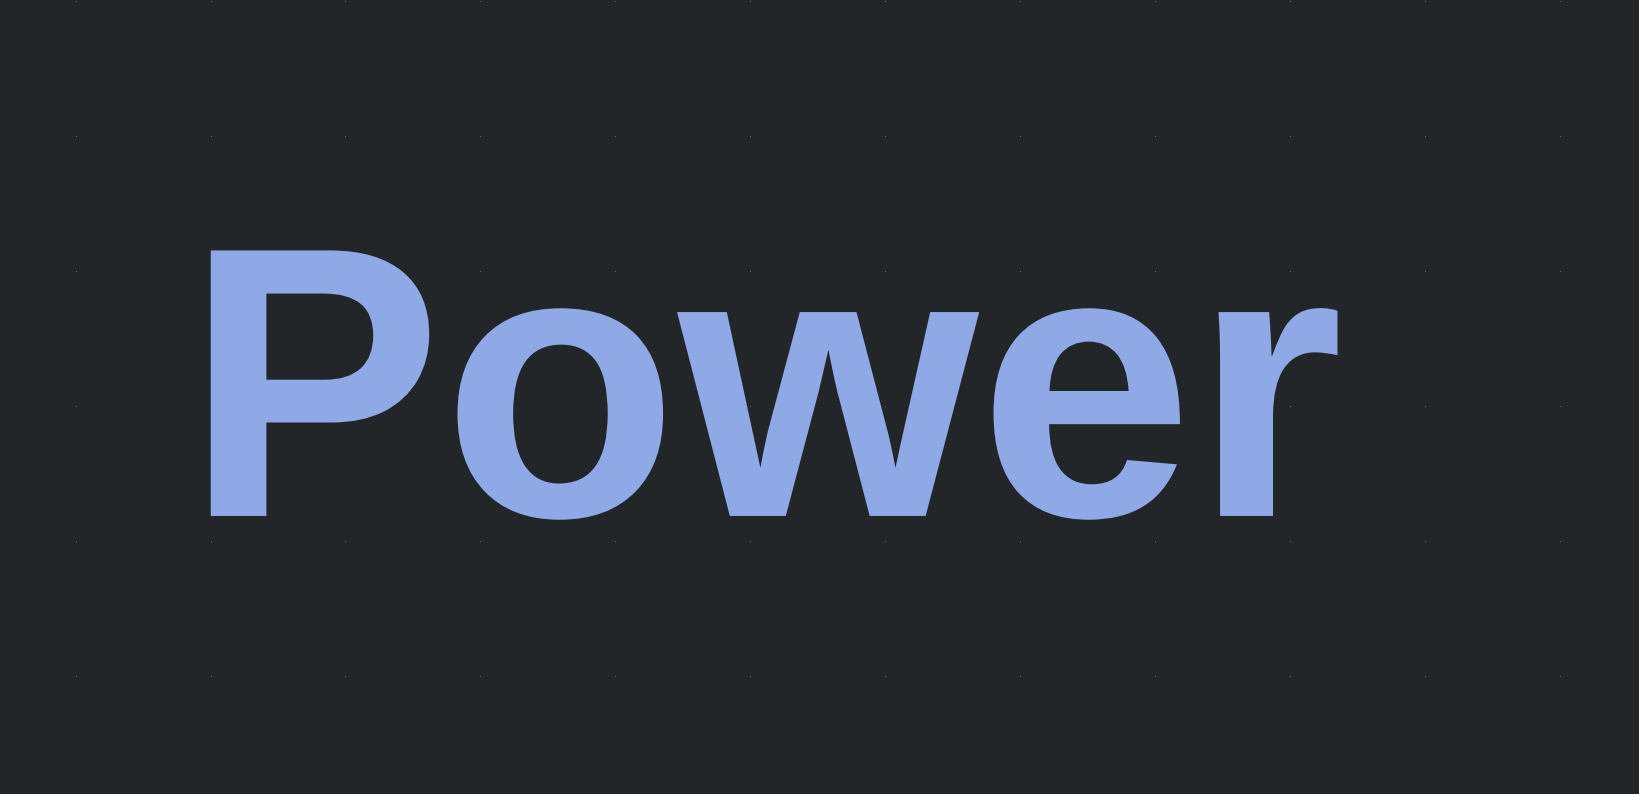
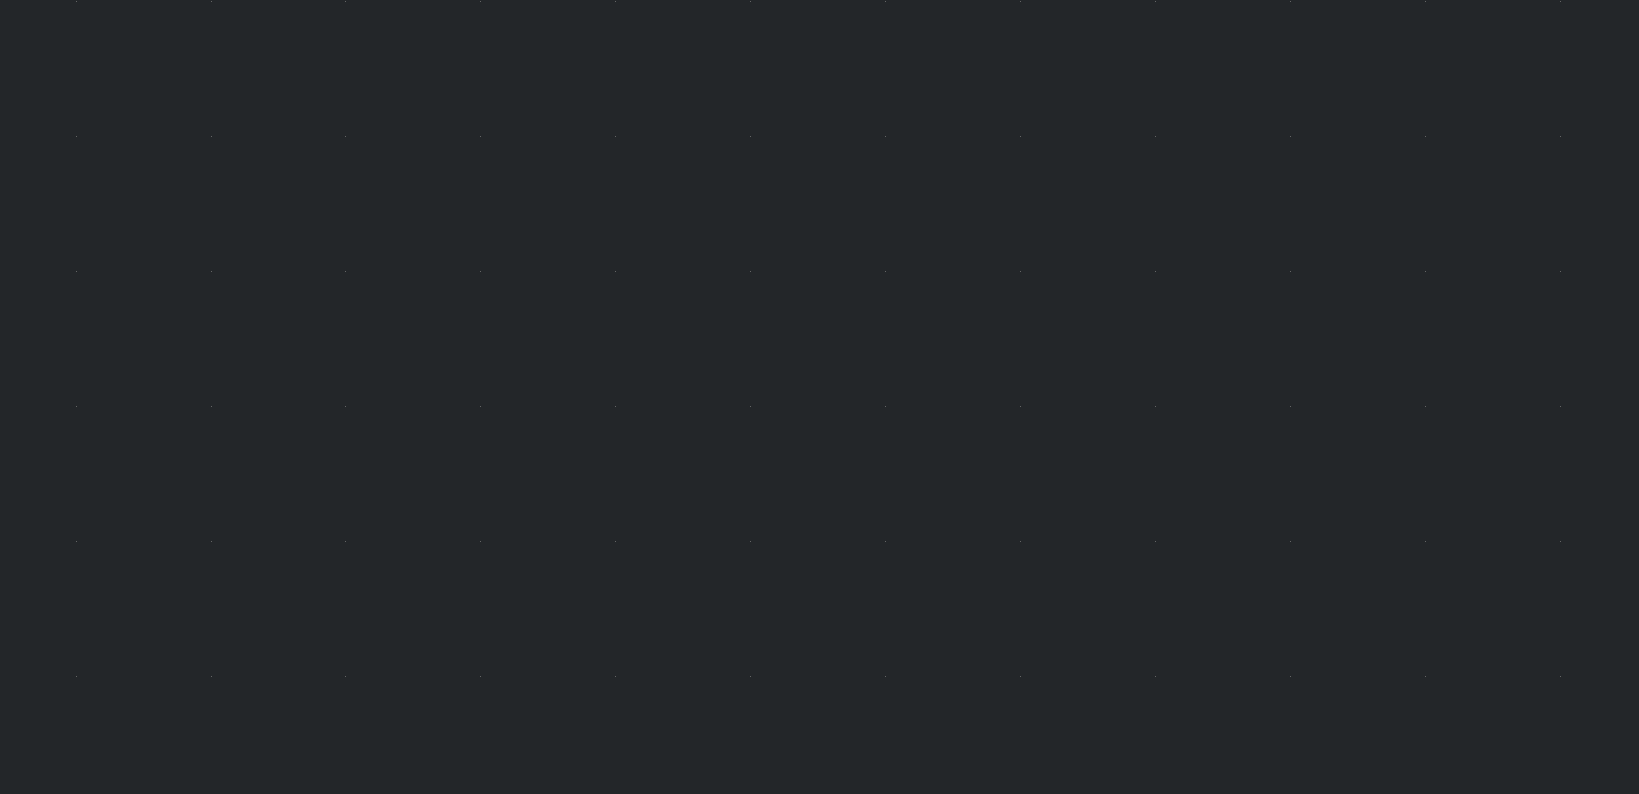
text: Power (774, 385) -> none

